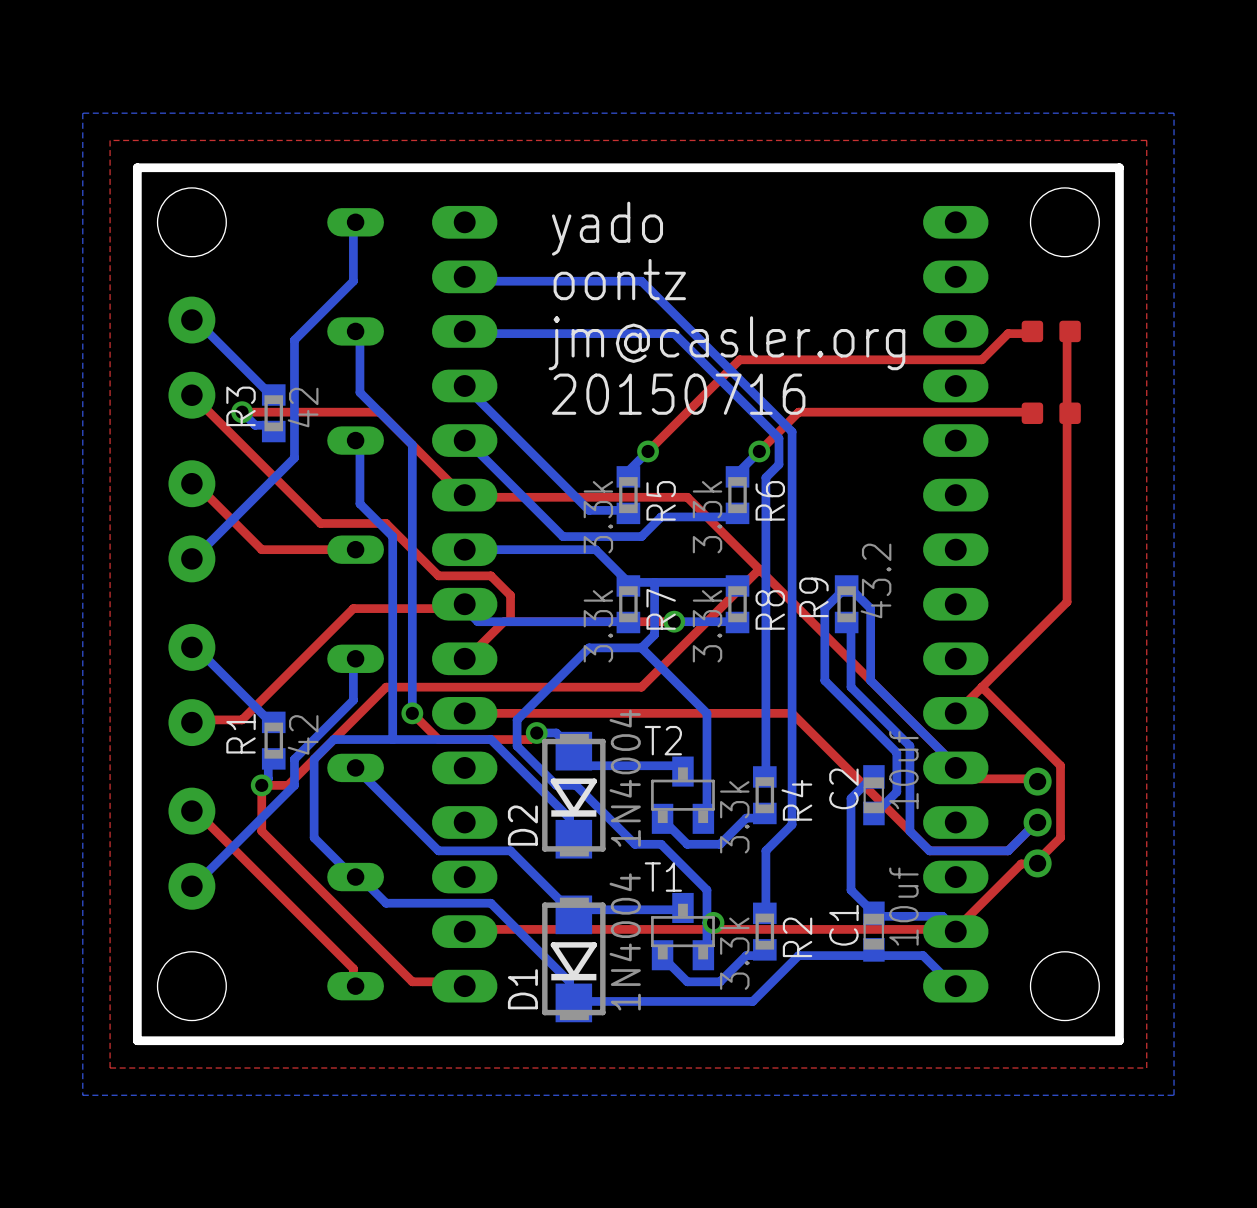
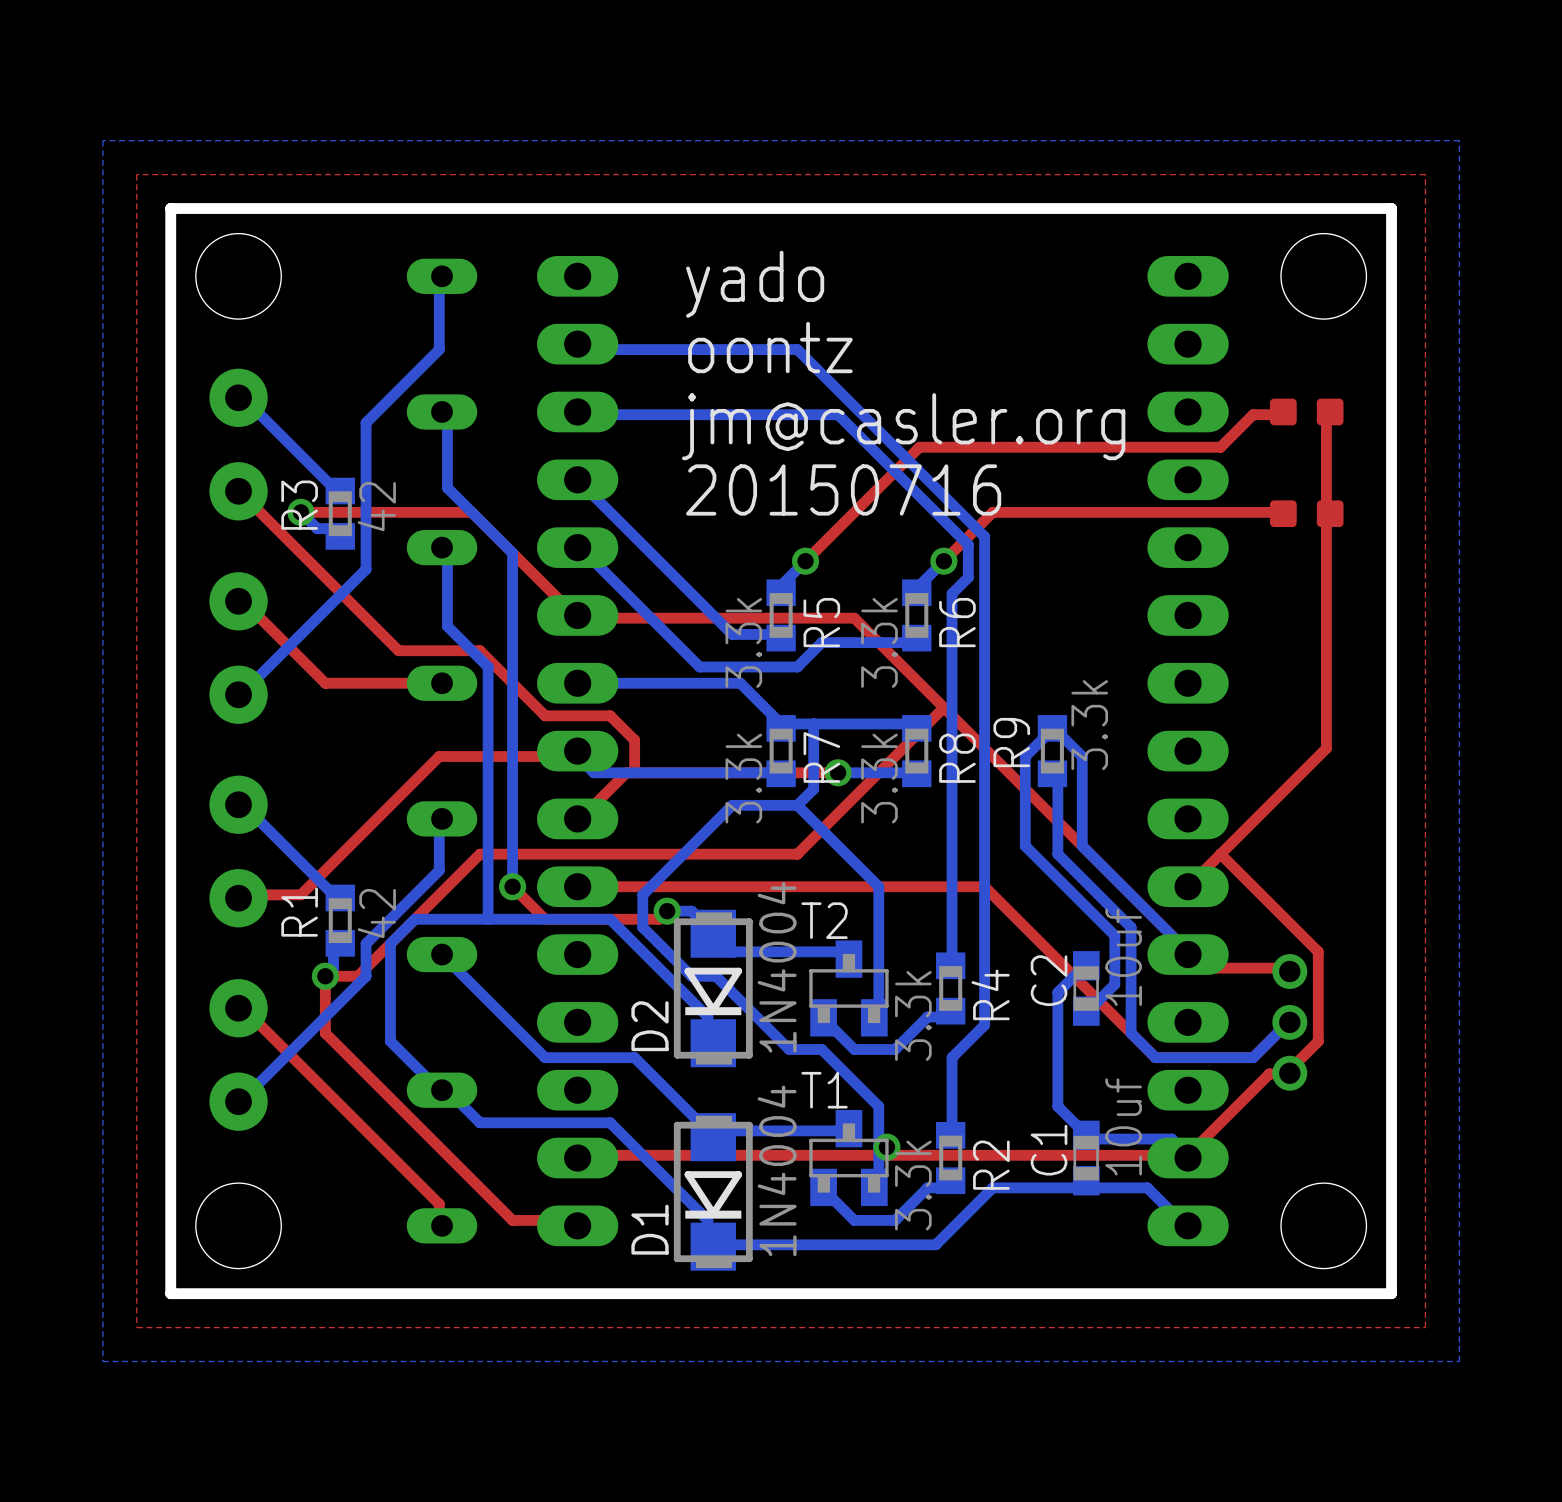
R9 value: 43.2 (876, 580) -> 3.3k (1089, 725)

